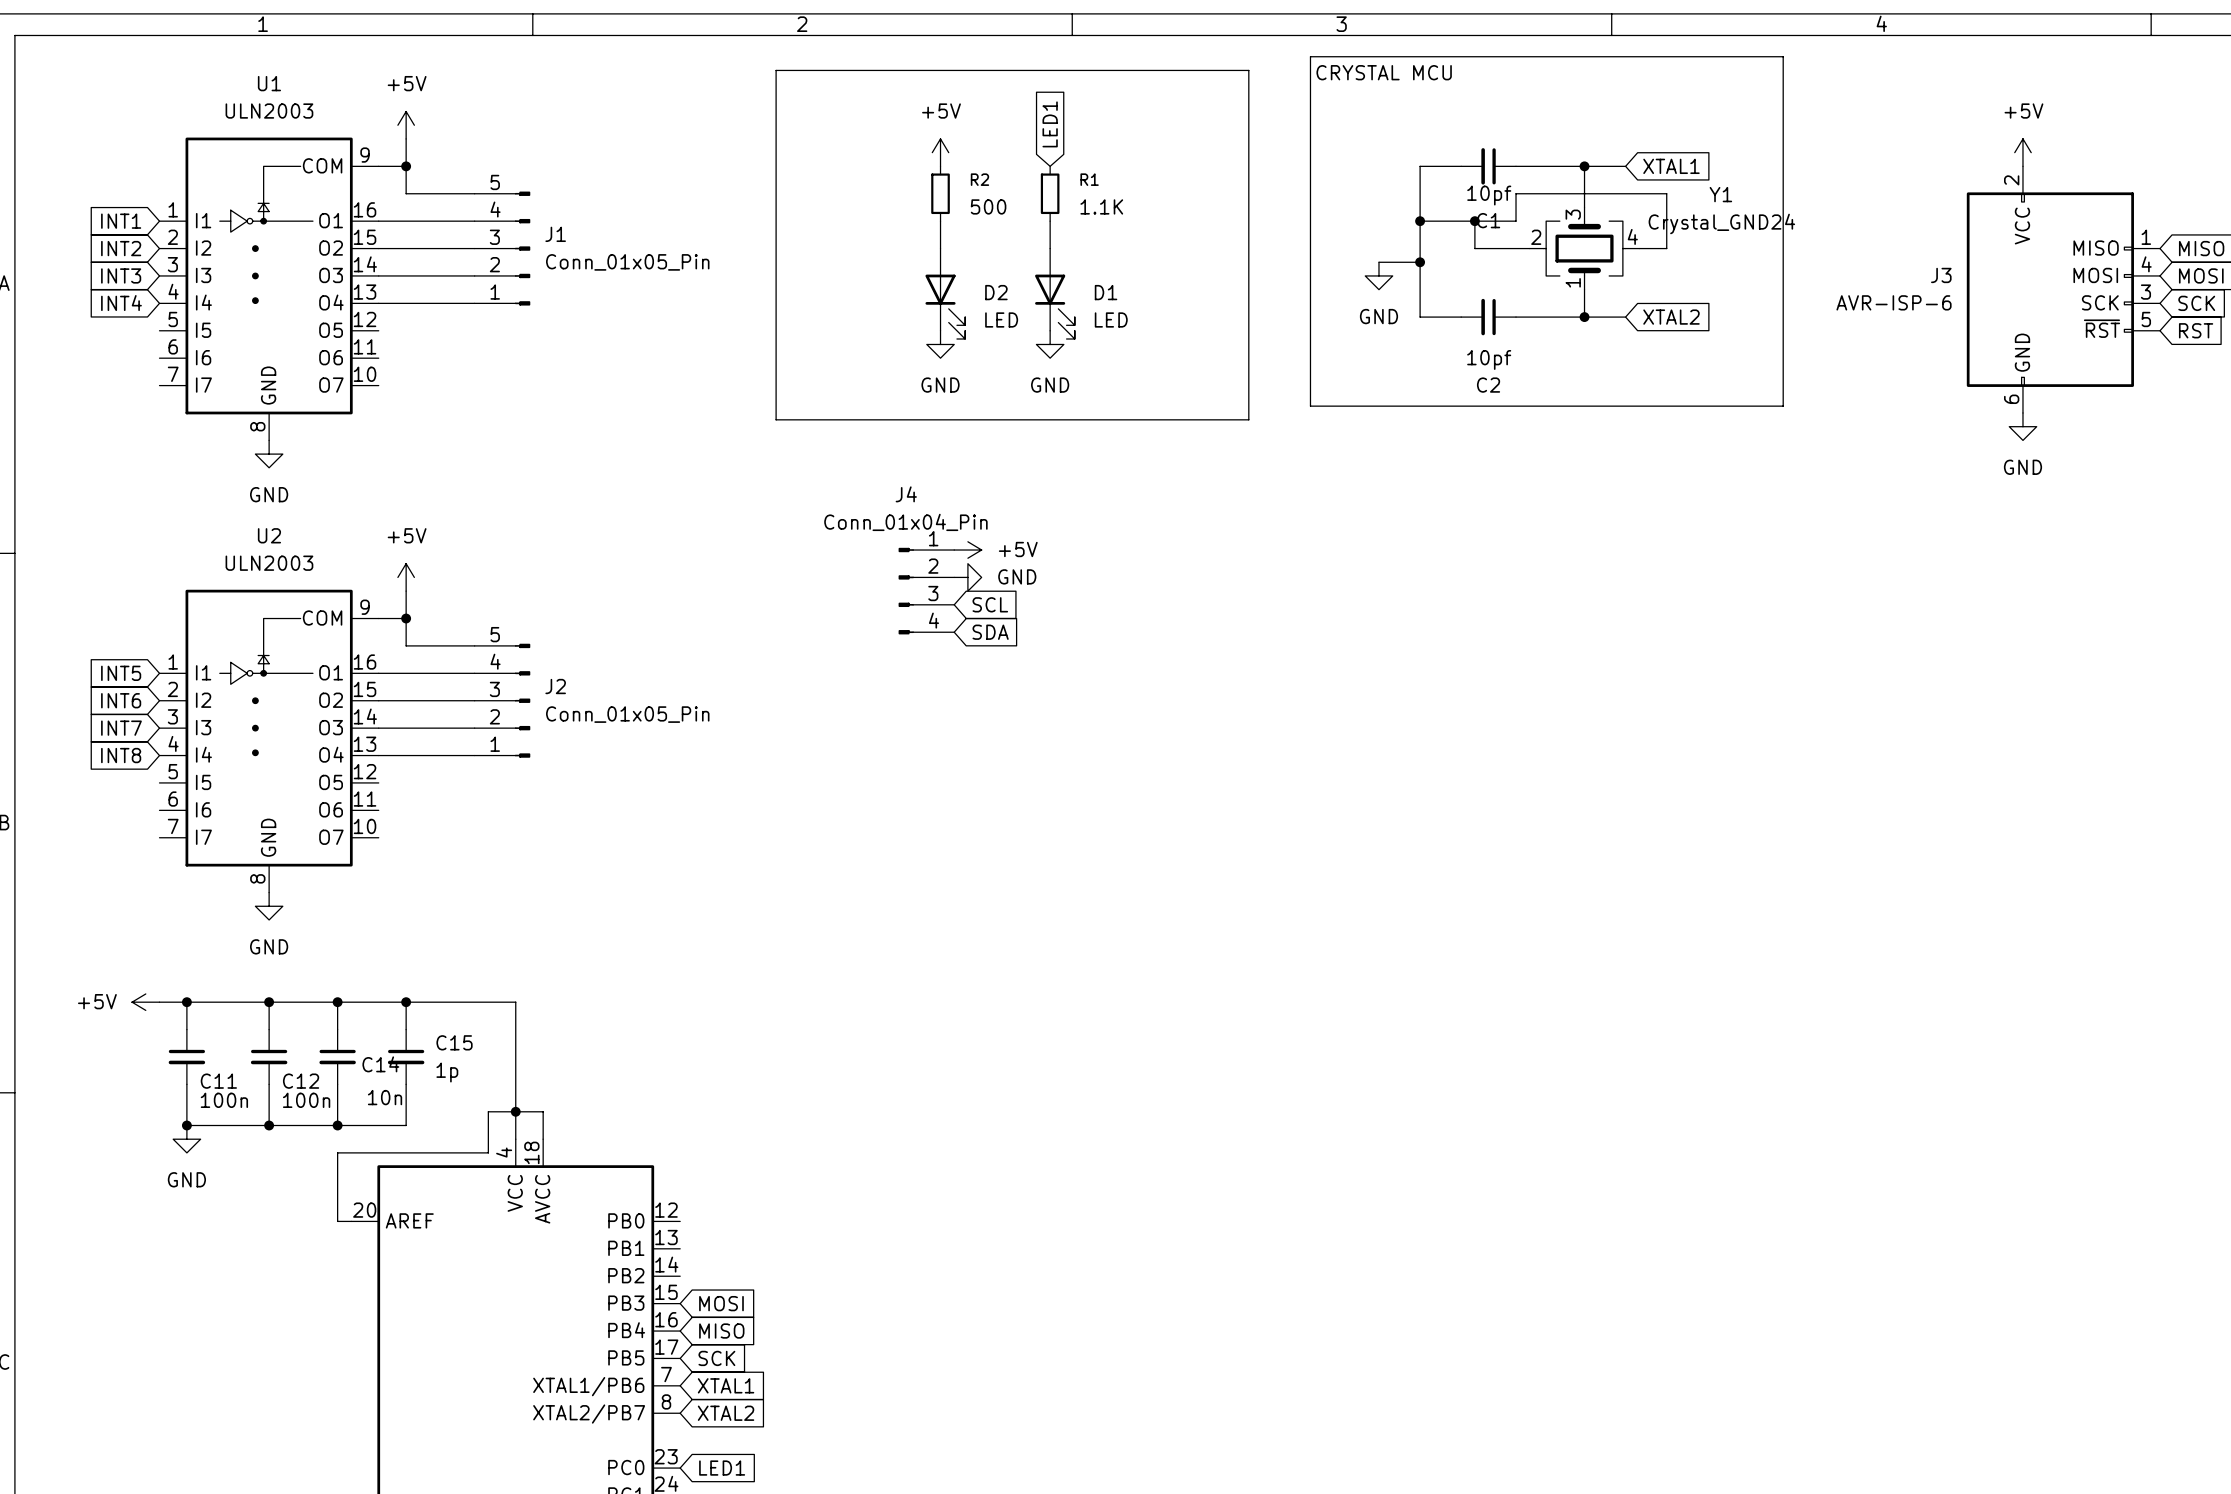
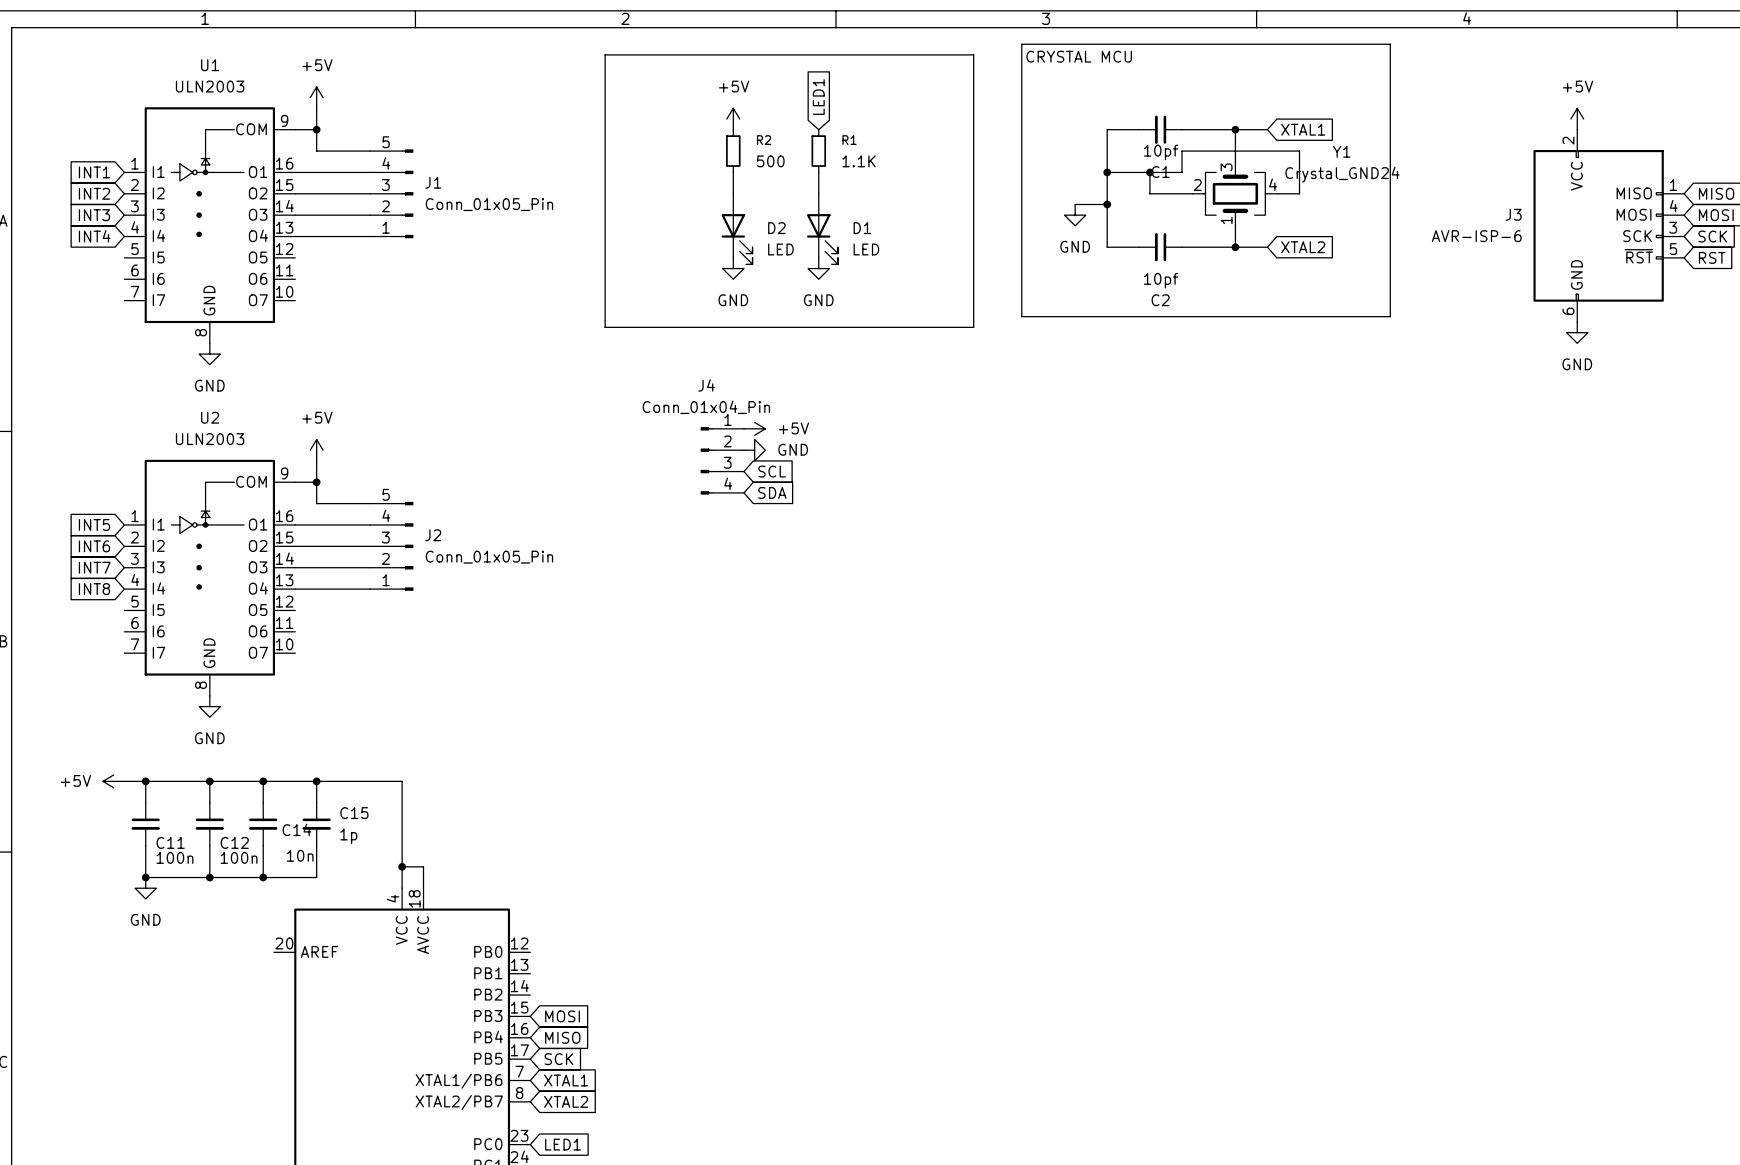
wire: (515, 1111) (488, 1111) (488, 1152) (337, 1152) (337, 1221) (351, 1221) -> none

